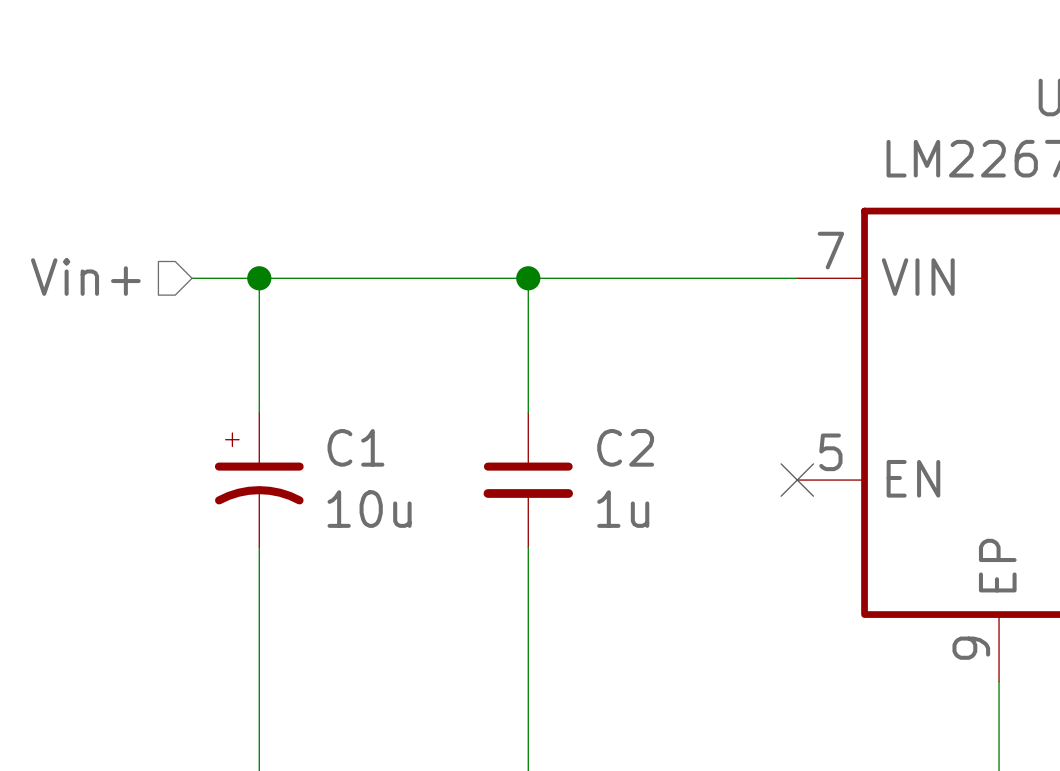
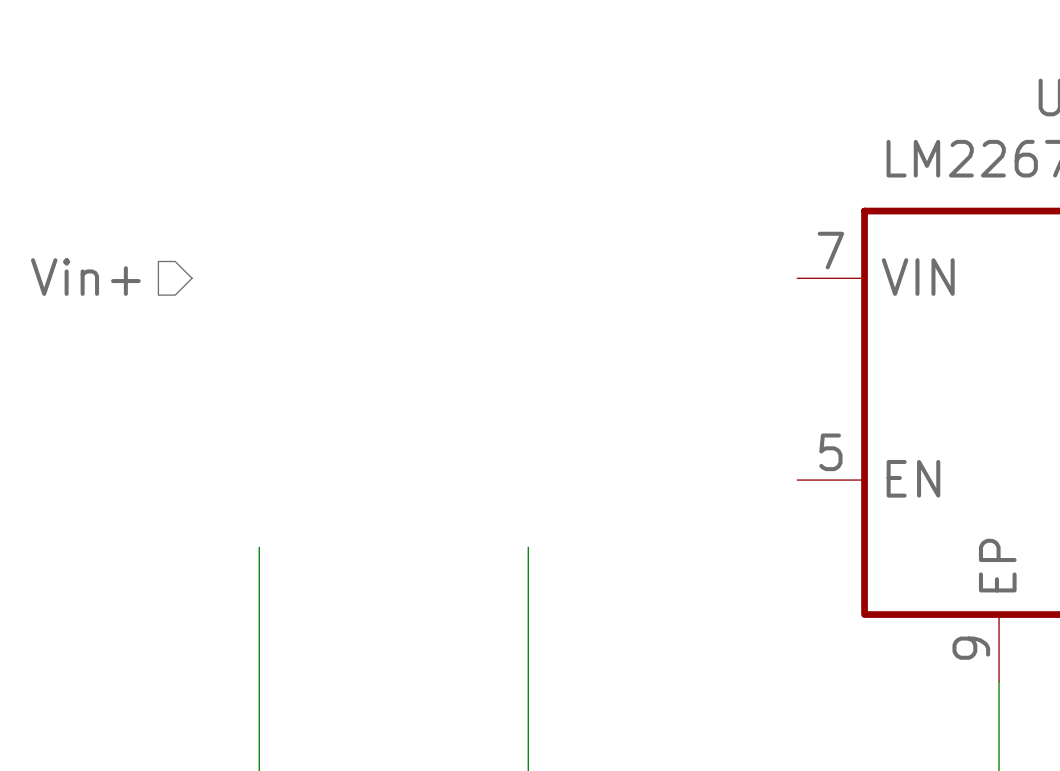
wire: (192, 278) (797, 278) -> none
wire: (259, 278) (259, 412) -> none
junction: (259, 278) -> none
wire: (528, 278) (528, 412) -> none
junction: (528, 278) -> none
C1: 10u (259, 480) -> none
C2: 1u (528, 480) -> none
no-connect mark: (797, 480) -> none

